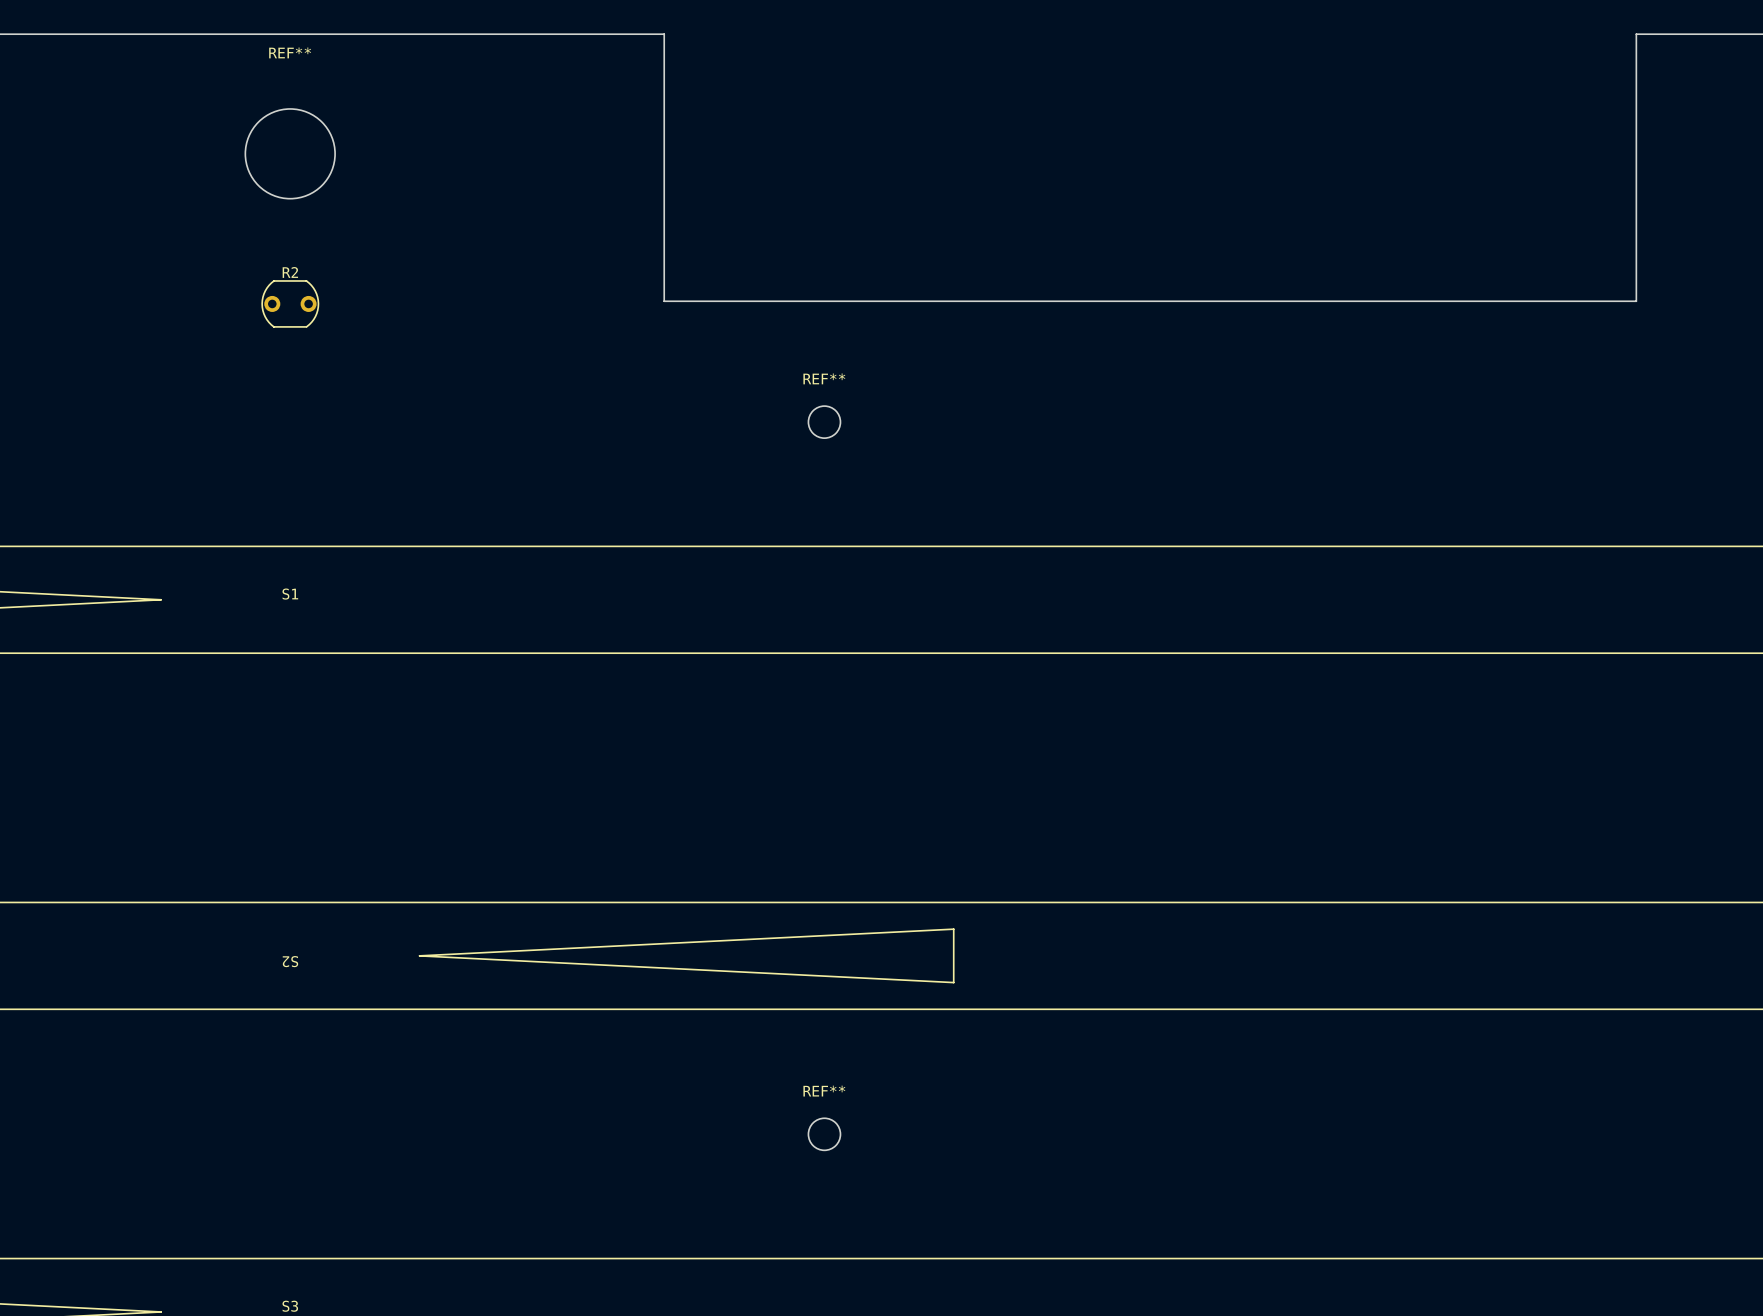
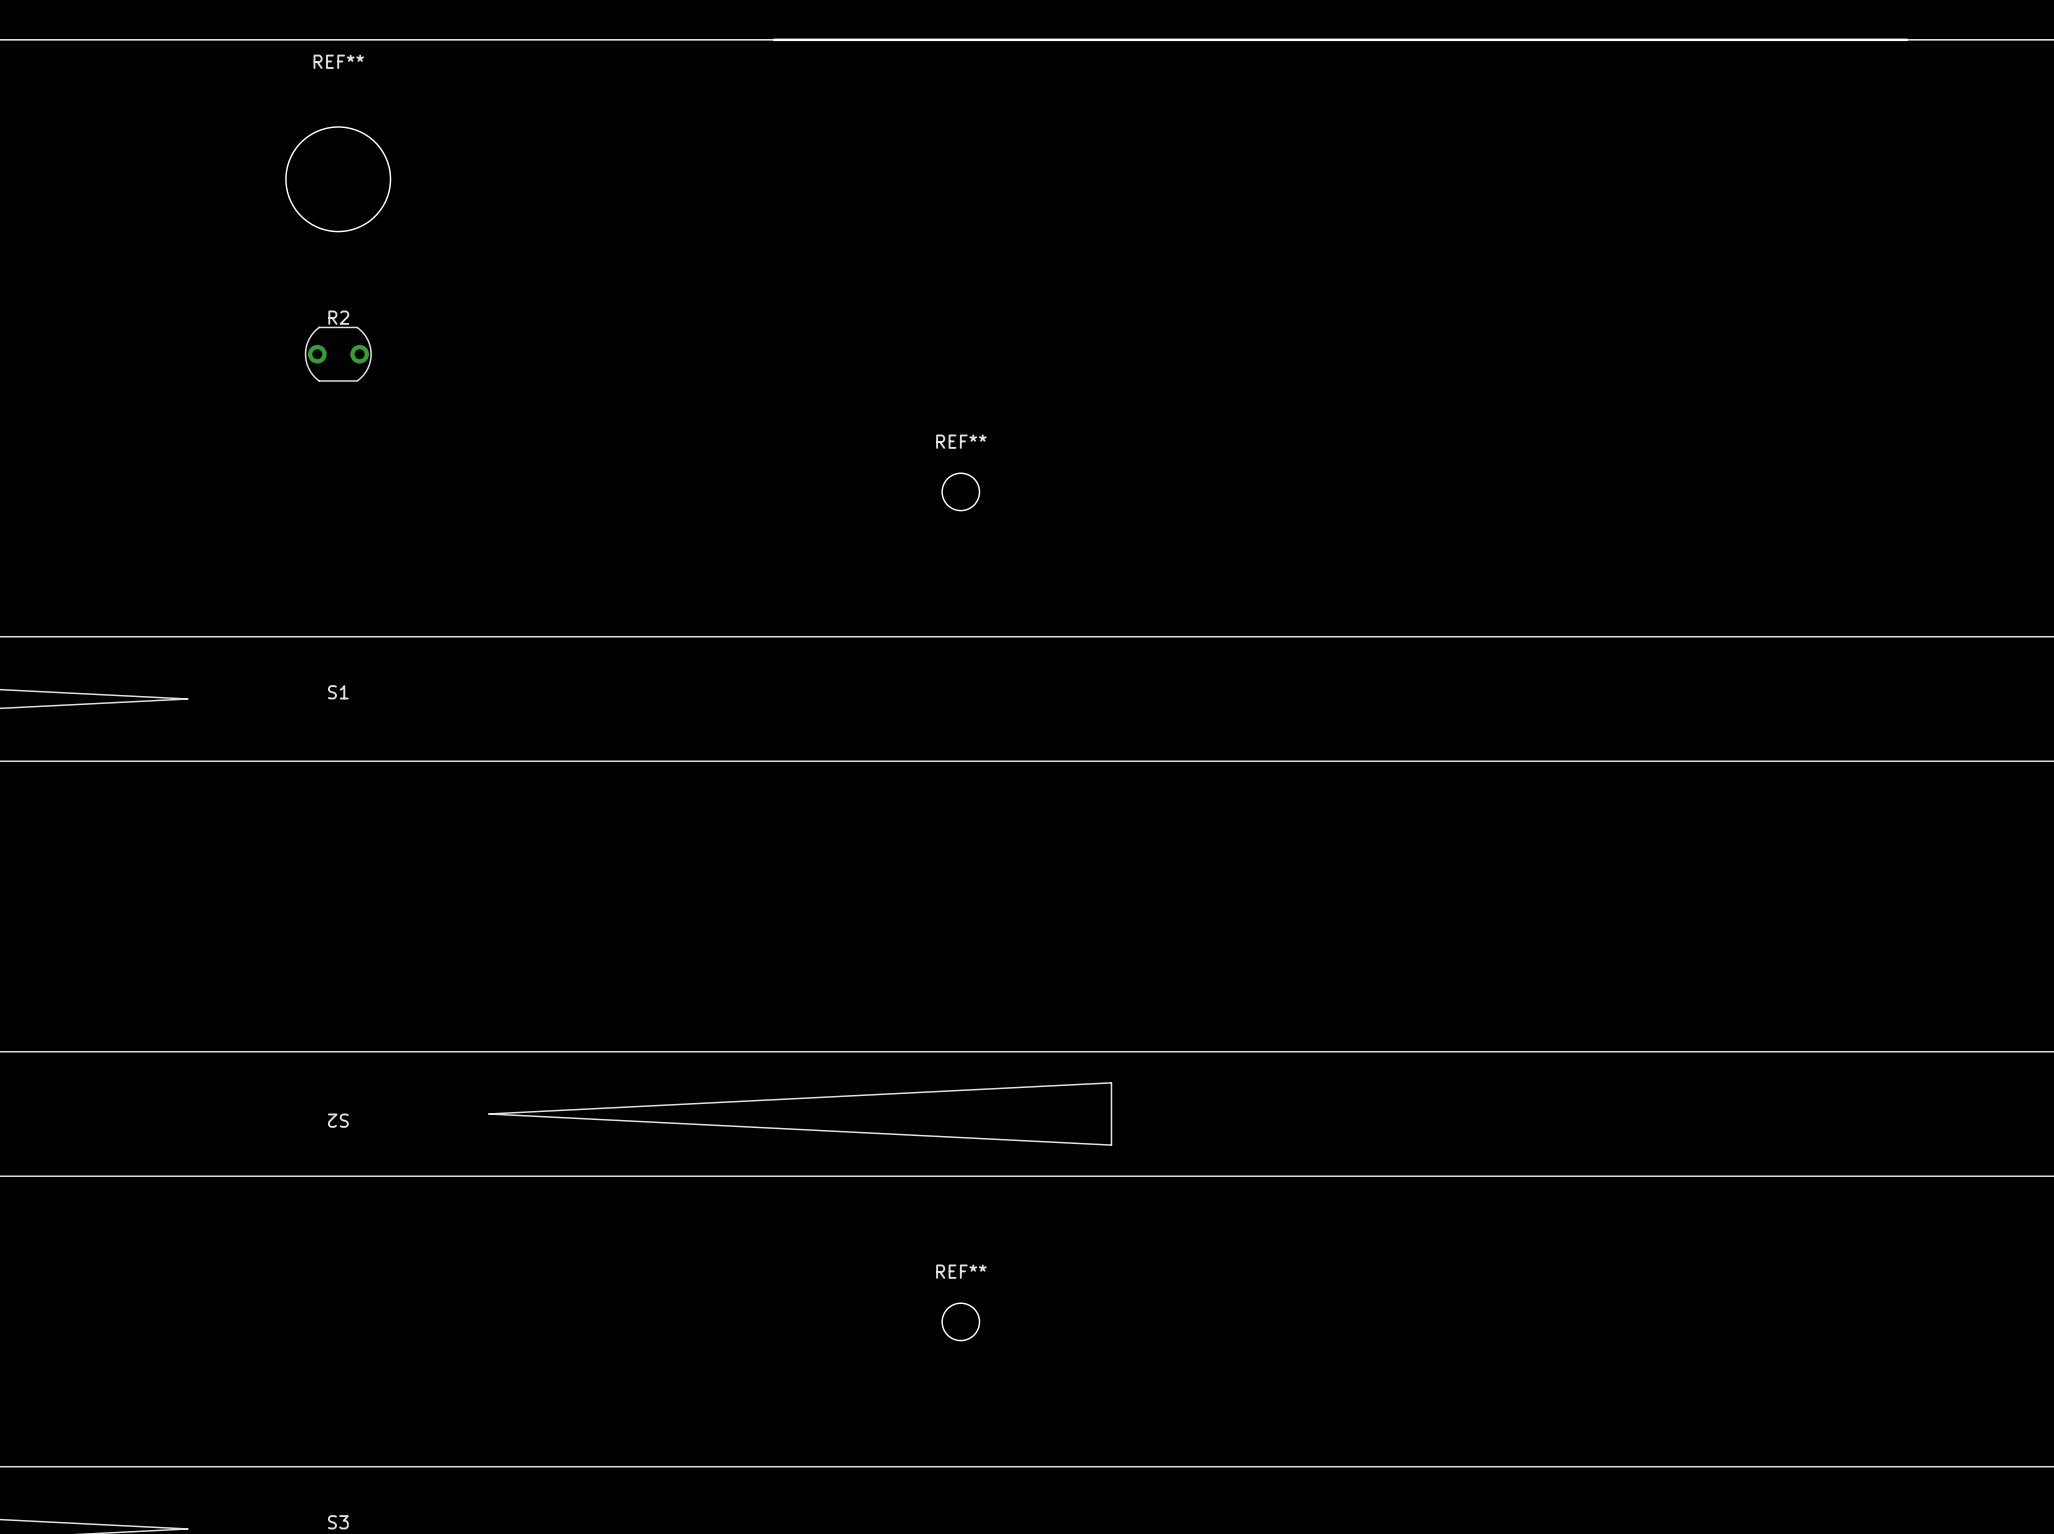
board edge: (664, 34) (664, 301) (1636, 301) (1636, 34) -> (774, 39) (1907, 39)

